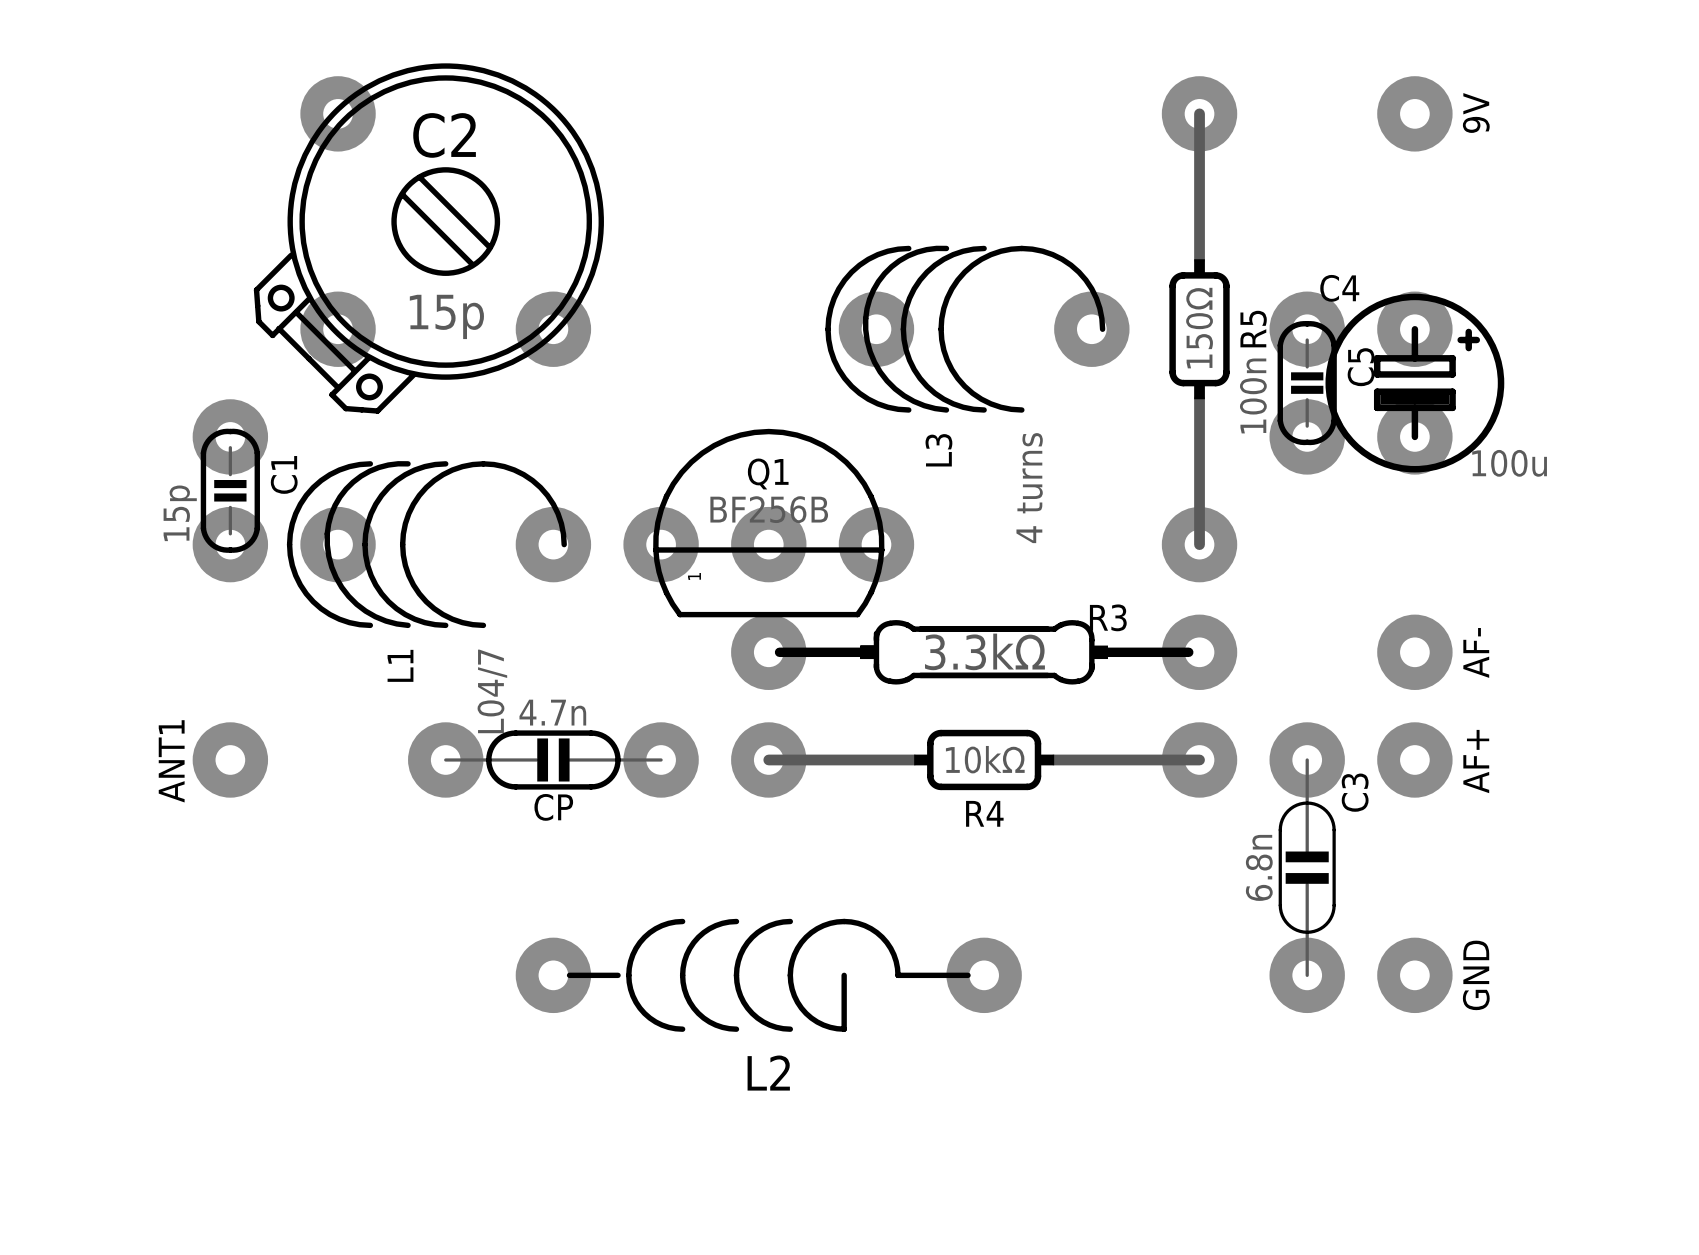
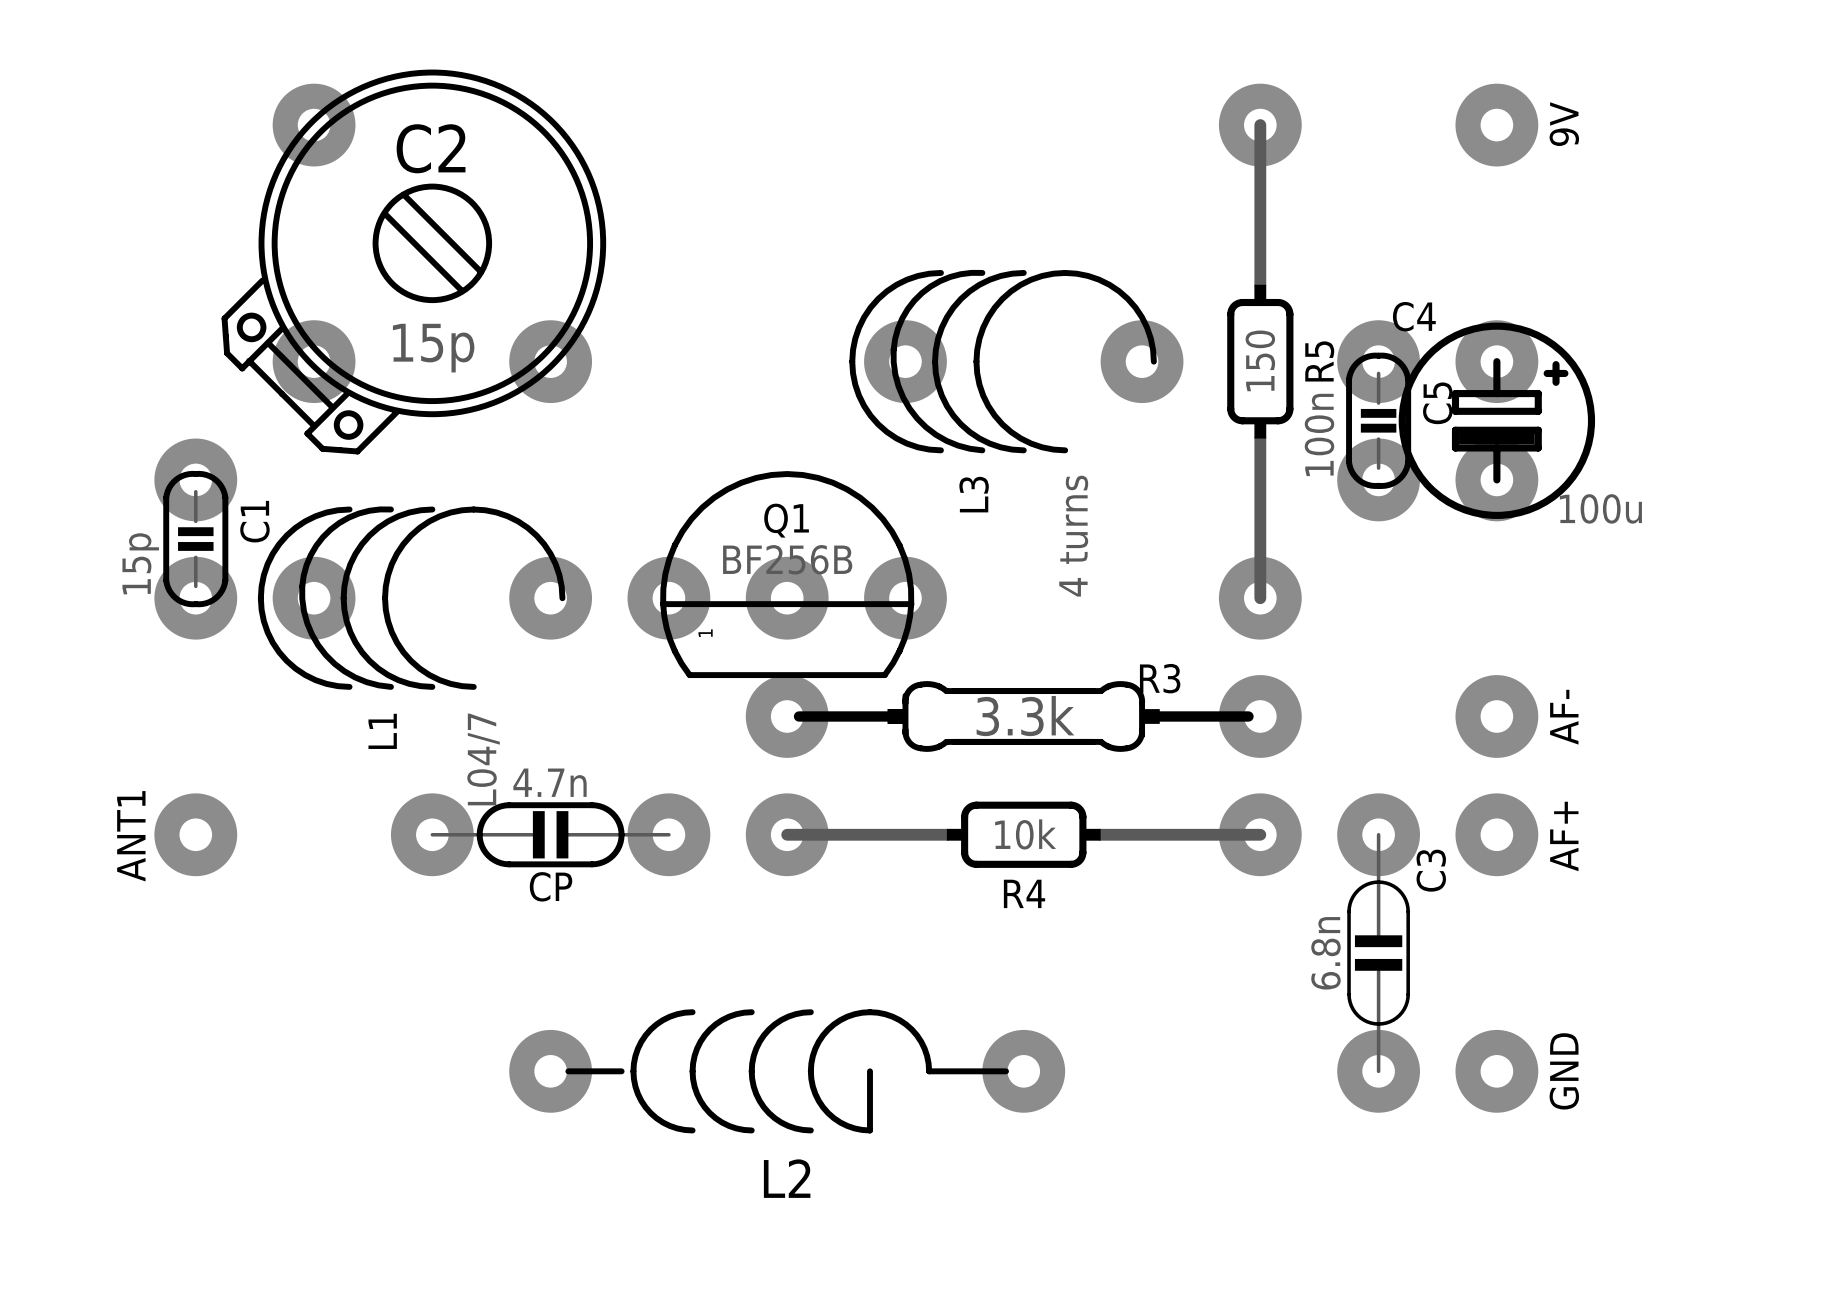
R5 value: 150Ω (1199, 328) -> 150 (1260, 360)
R3 value: 3.3kΩ (984, 651) -> 3.3k (1025, 716)
R4 value: 10kΩ (985, 759) -> 10k (1025, 834)

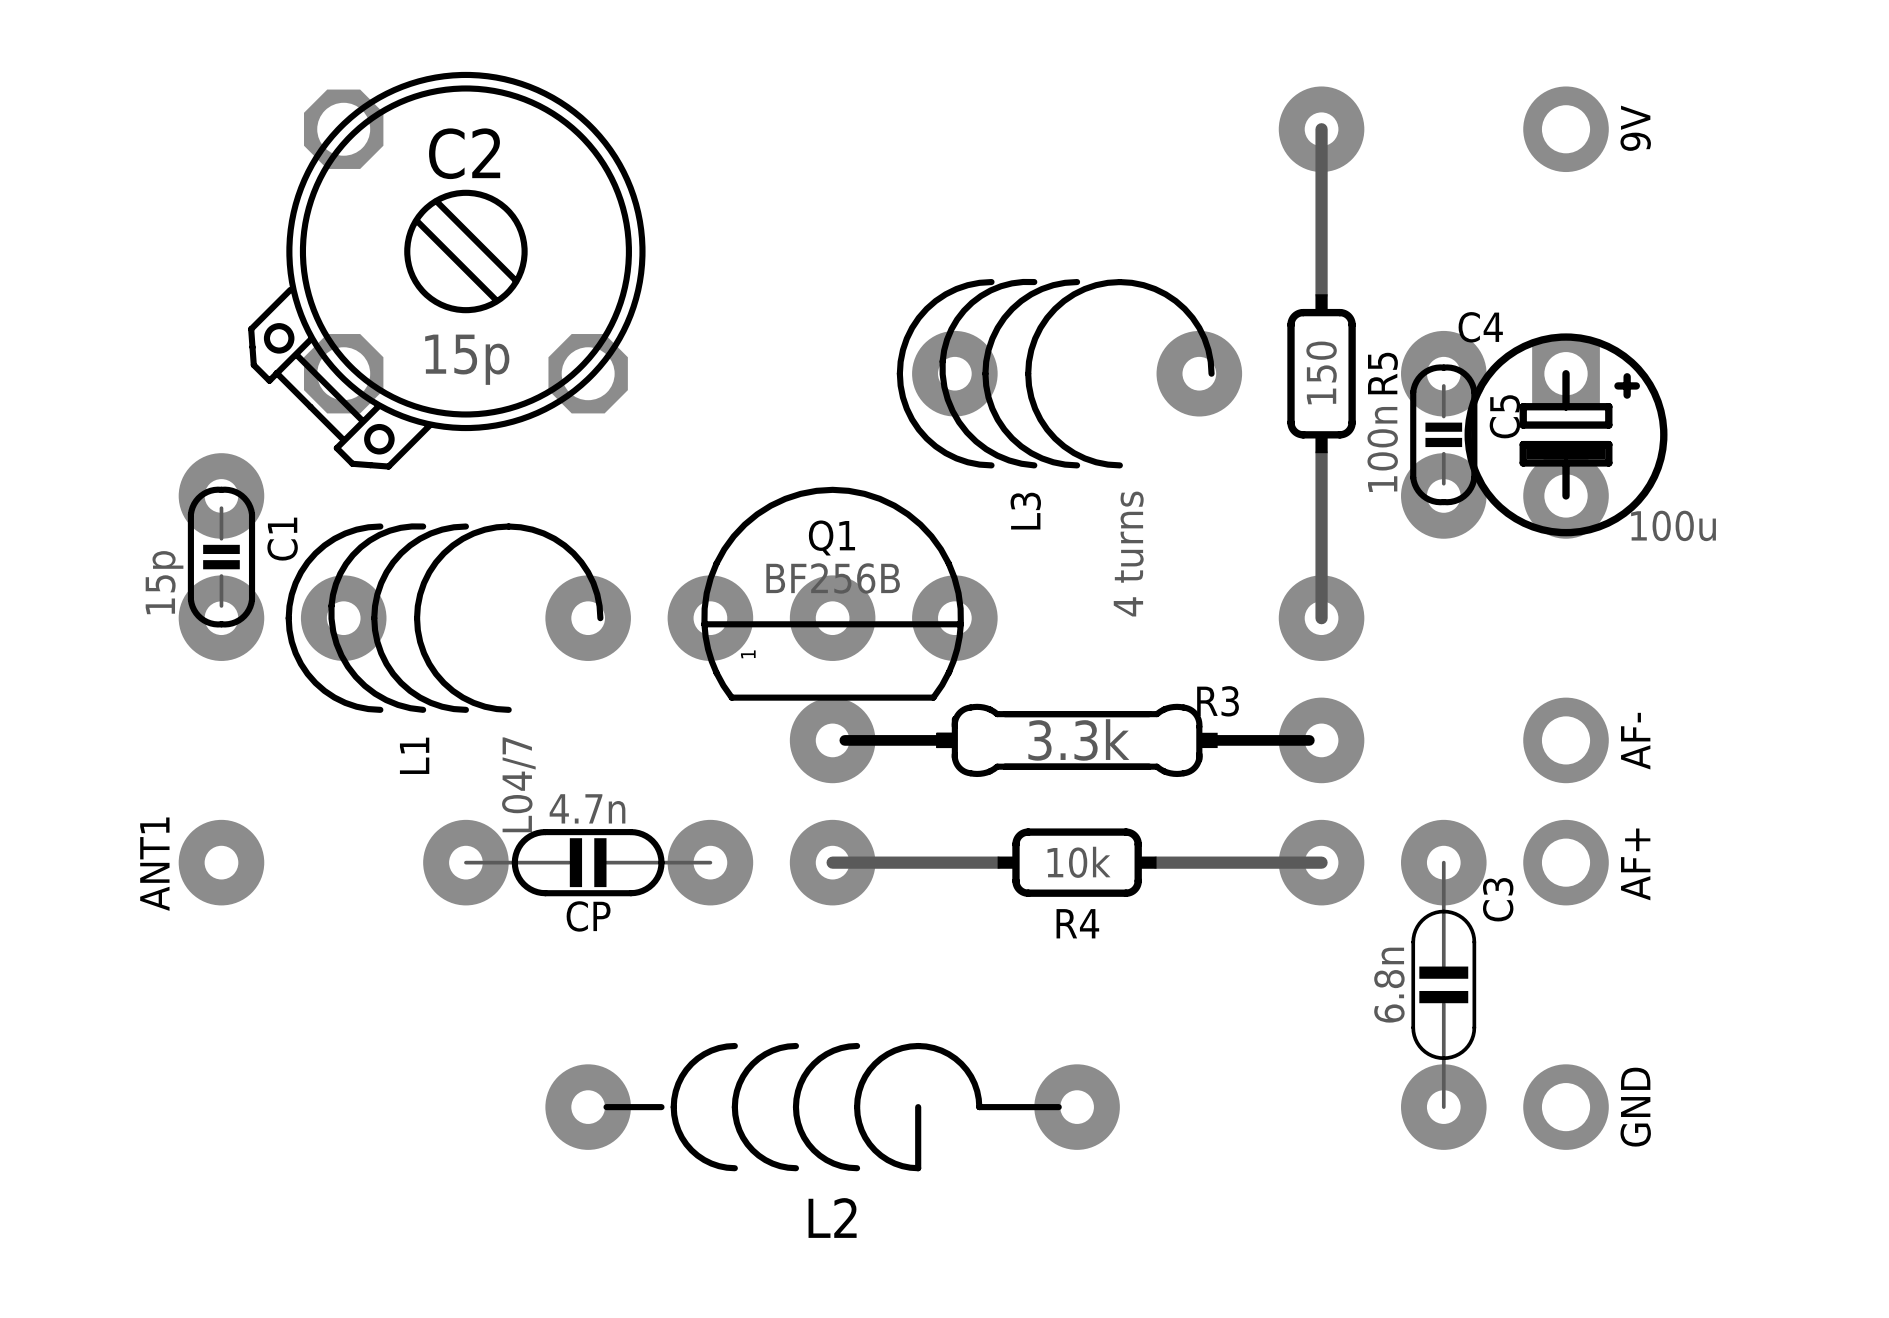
C2 footprint: [221, 69, 607, 455] -> [248, 71, 646, 470]
9V footprint: [1455, 83, 1539, 167] -> [1523, 86, 1609, 173]
C4 footprint: [1398, 320, 1596, 522] -> [1464, 333, 1668, 539]
AF- footprint: [1455, 675, 1539, 758] -> [1523, 697, 1609, 784]
AF+ footprint: [1455, 793, 1539, 877] -> [1523, 819, 1609, 906]
GND footprint: [1455, 1029, 1539, 1113] -> [1523, 1064, 1609, 1150]

